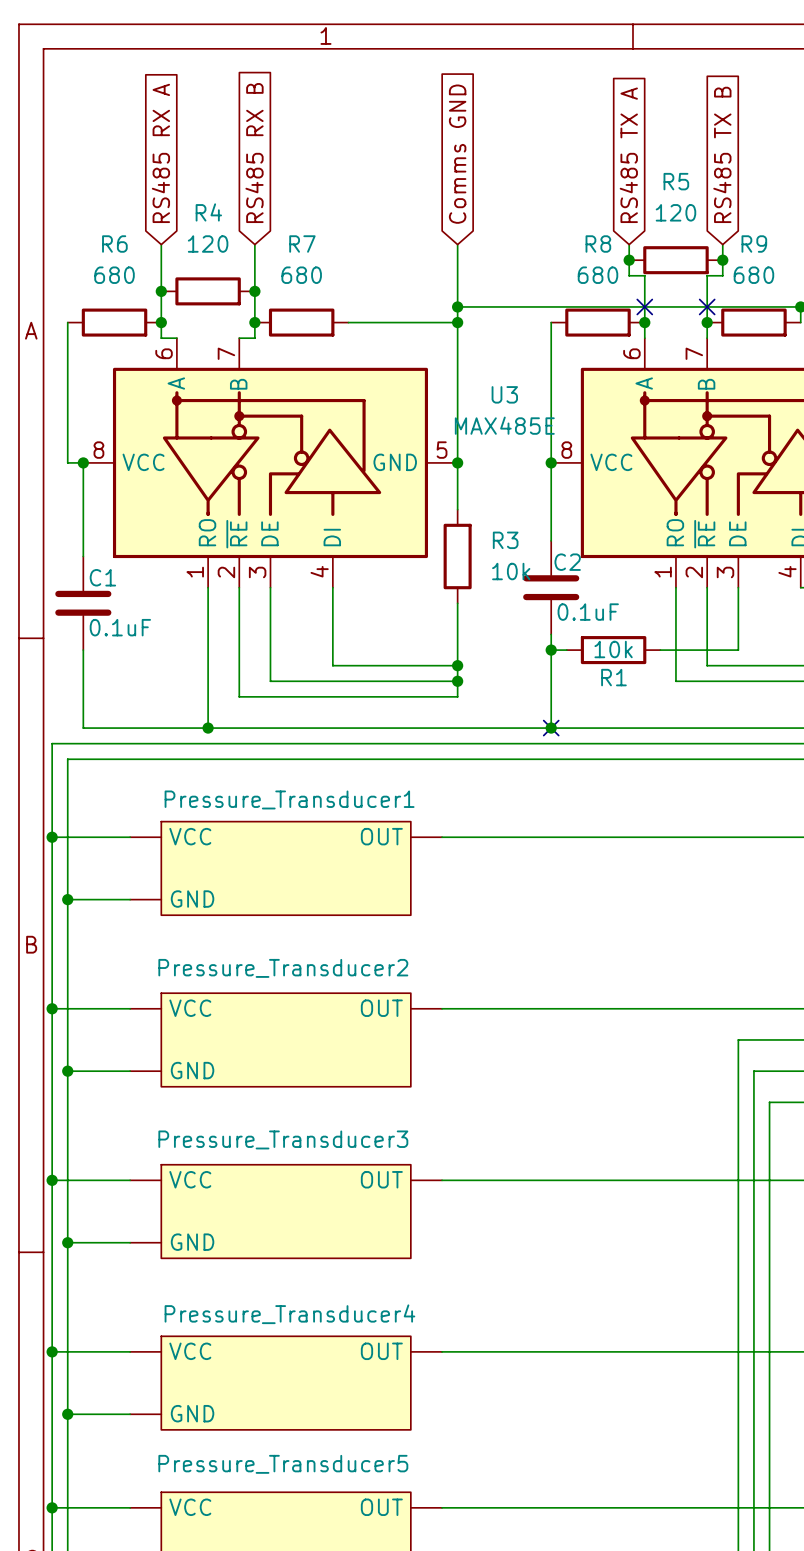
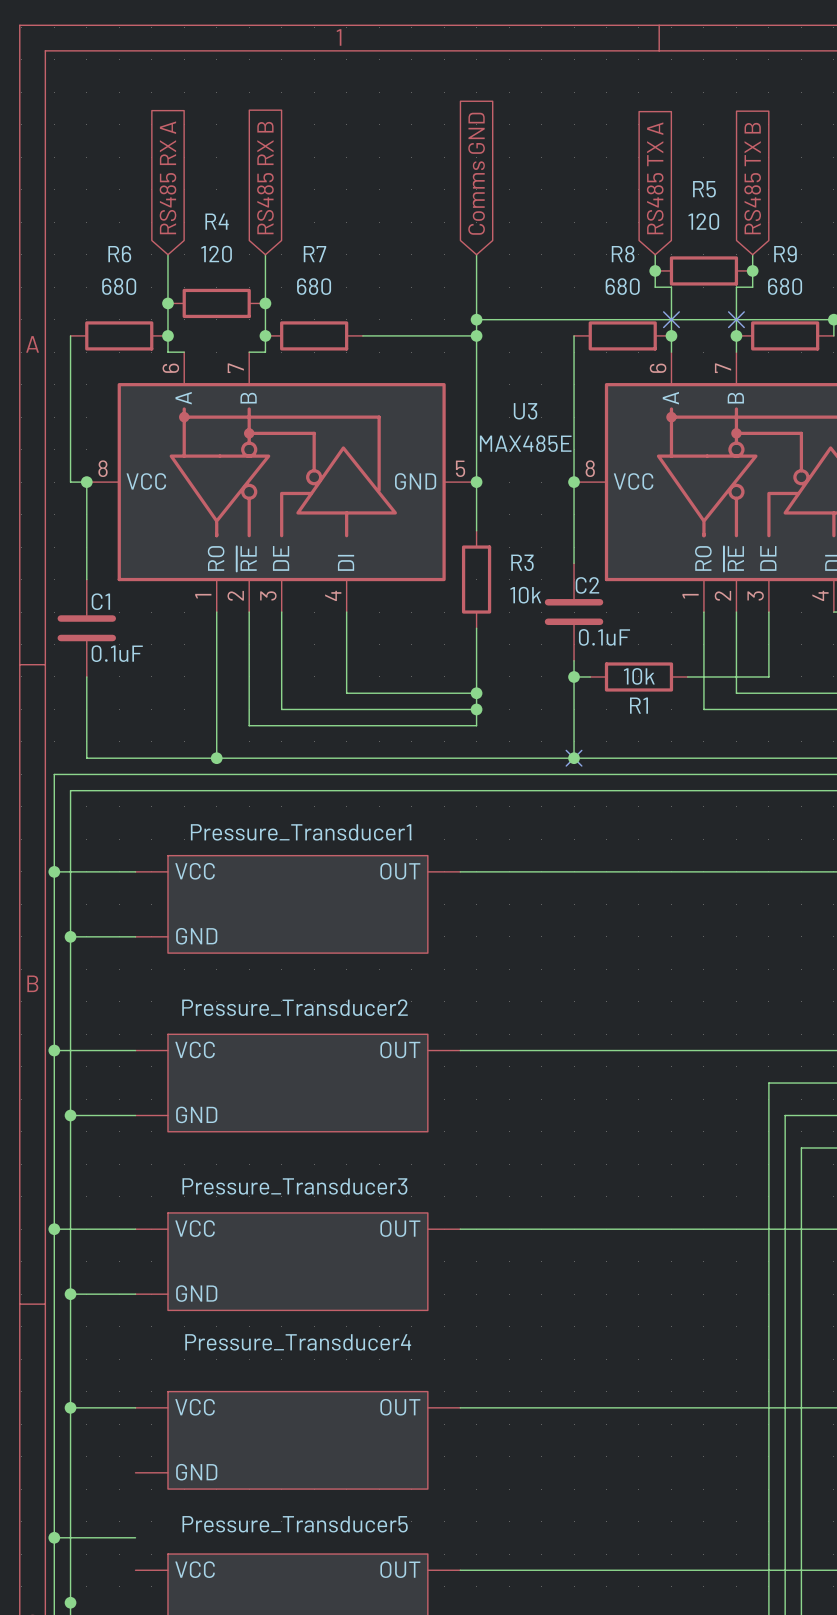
Pressure_Transducer4 name position: Pressure_Transducer4 (289, 1314) -> Pressure_Transducer4 (298, 1342)
wire: (52, 1351) (67, 1351) -> none
junction position: (52, 1351) -> (70, 1407)
wire: (67, 1414) (130, 1414) -> none
junction: (67, 1414) -> none
junction: none -> (54, 1537)
wire: (52, 1507) (130, 1507) -> (54, 1537) (135, 1537)
junction: (52, 1507) -> none
junction: none -> (70, 1602)

